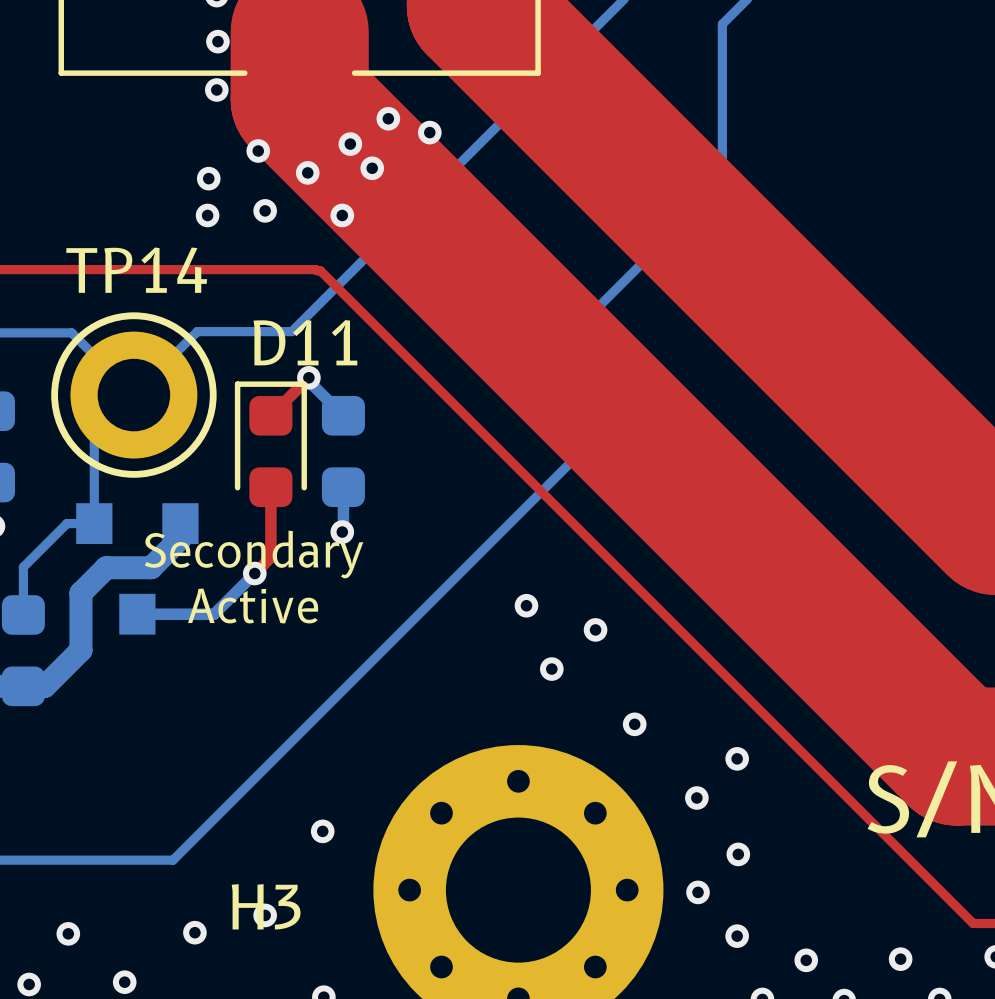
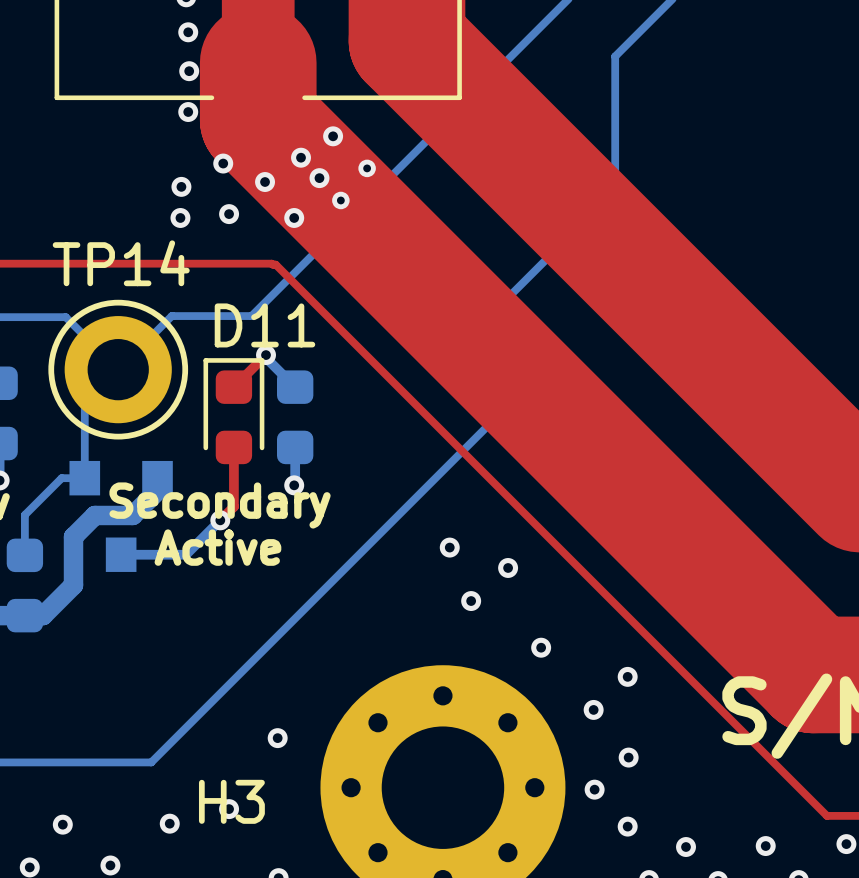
via: (429, 132) -> none
via: none -> (367, 168)
via: none -> (340, 200)

